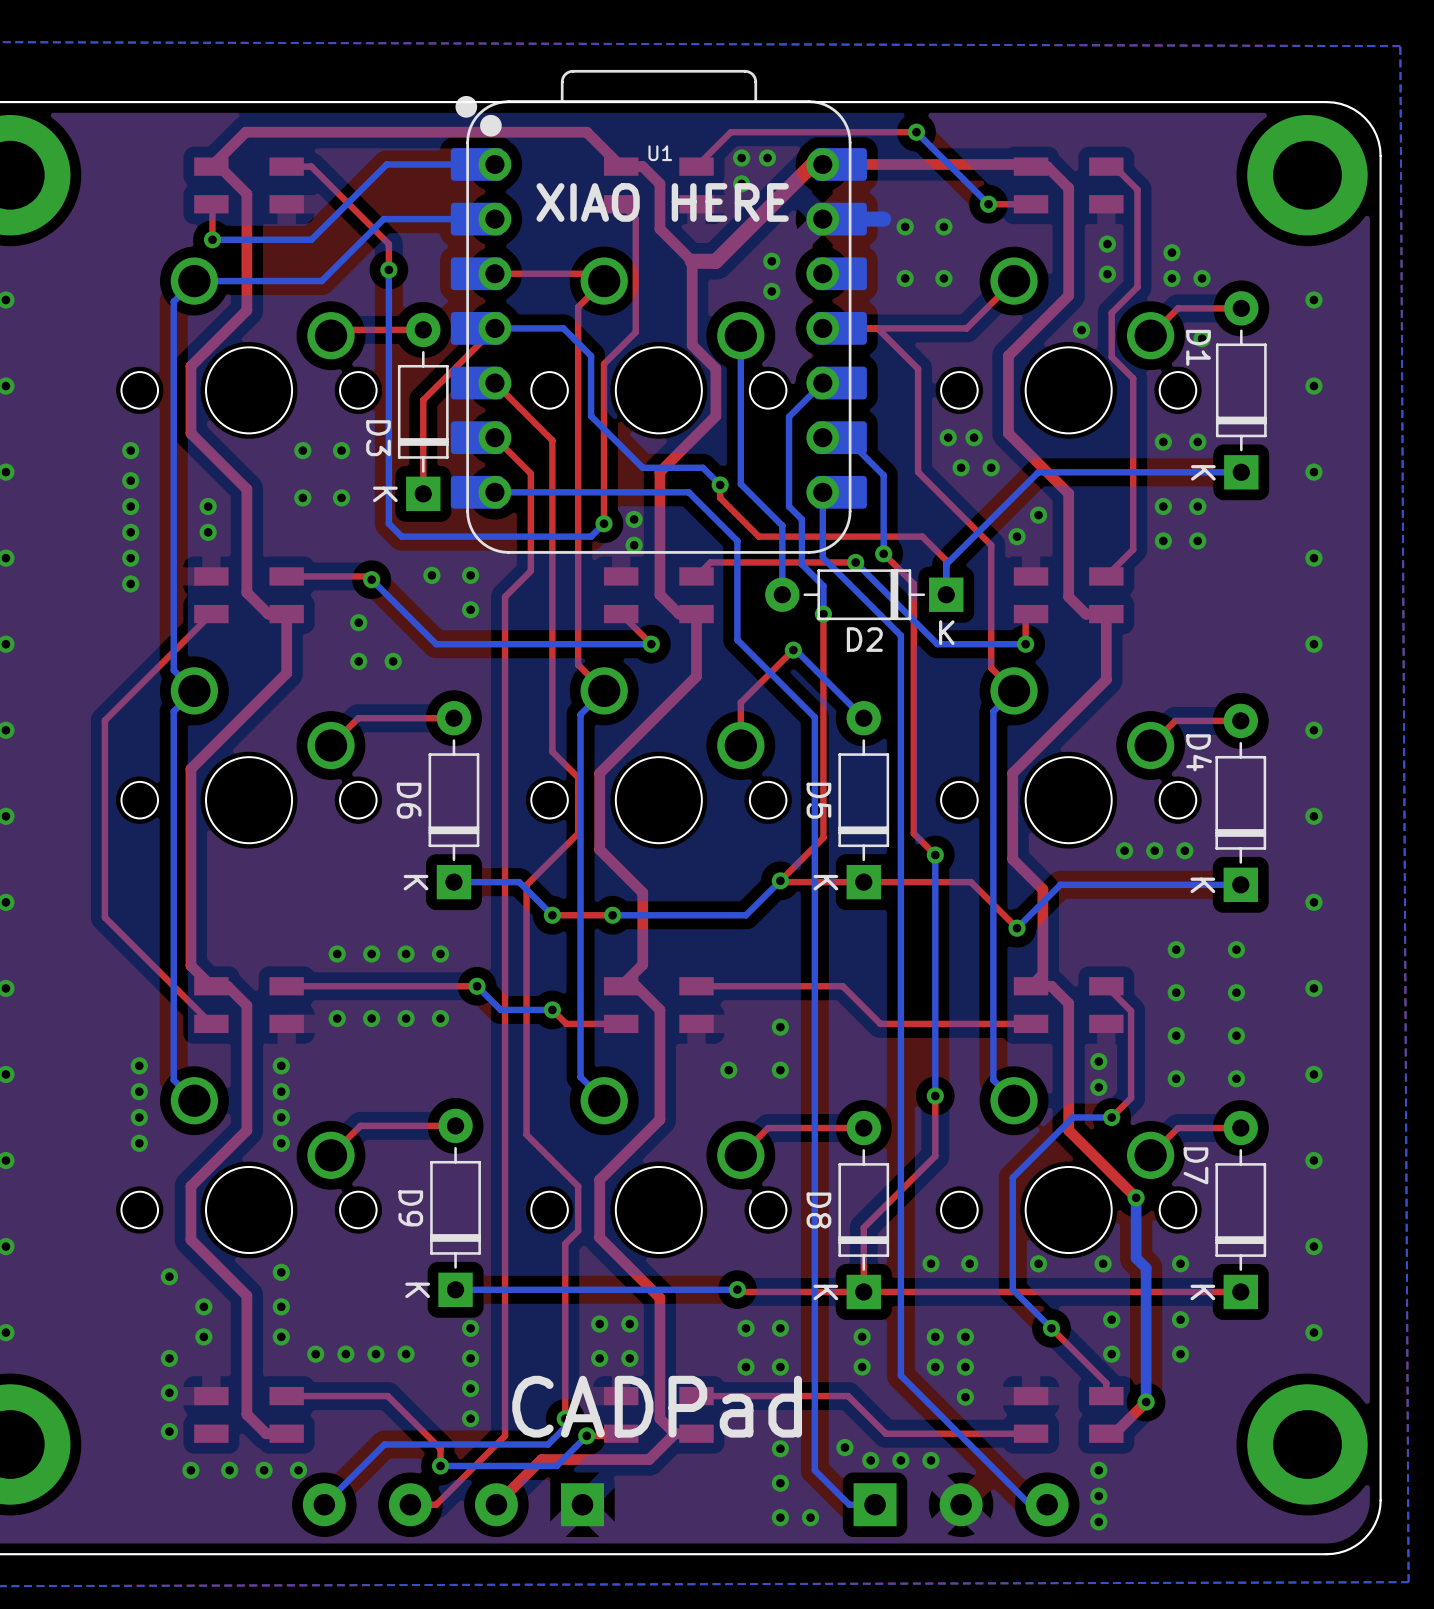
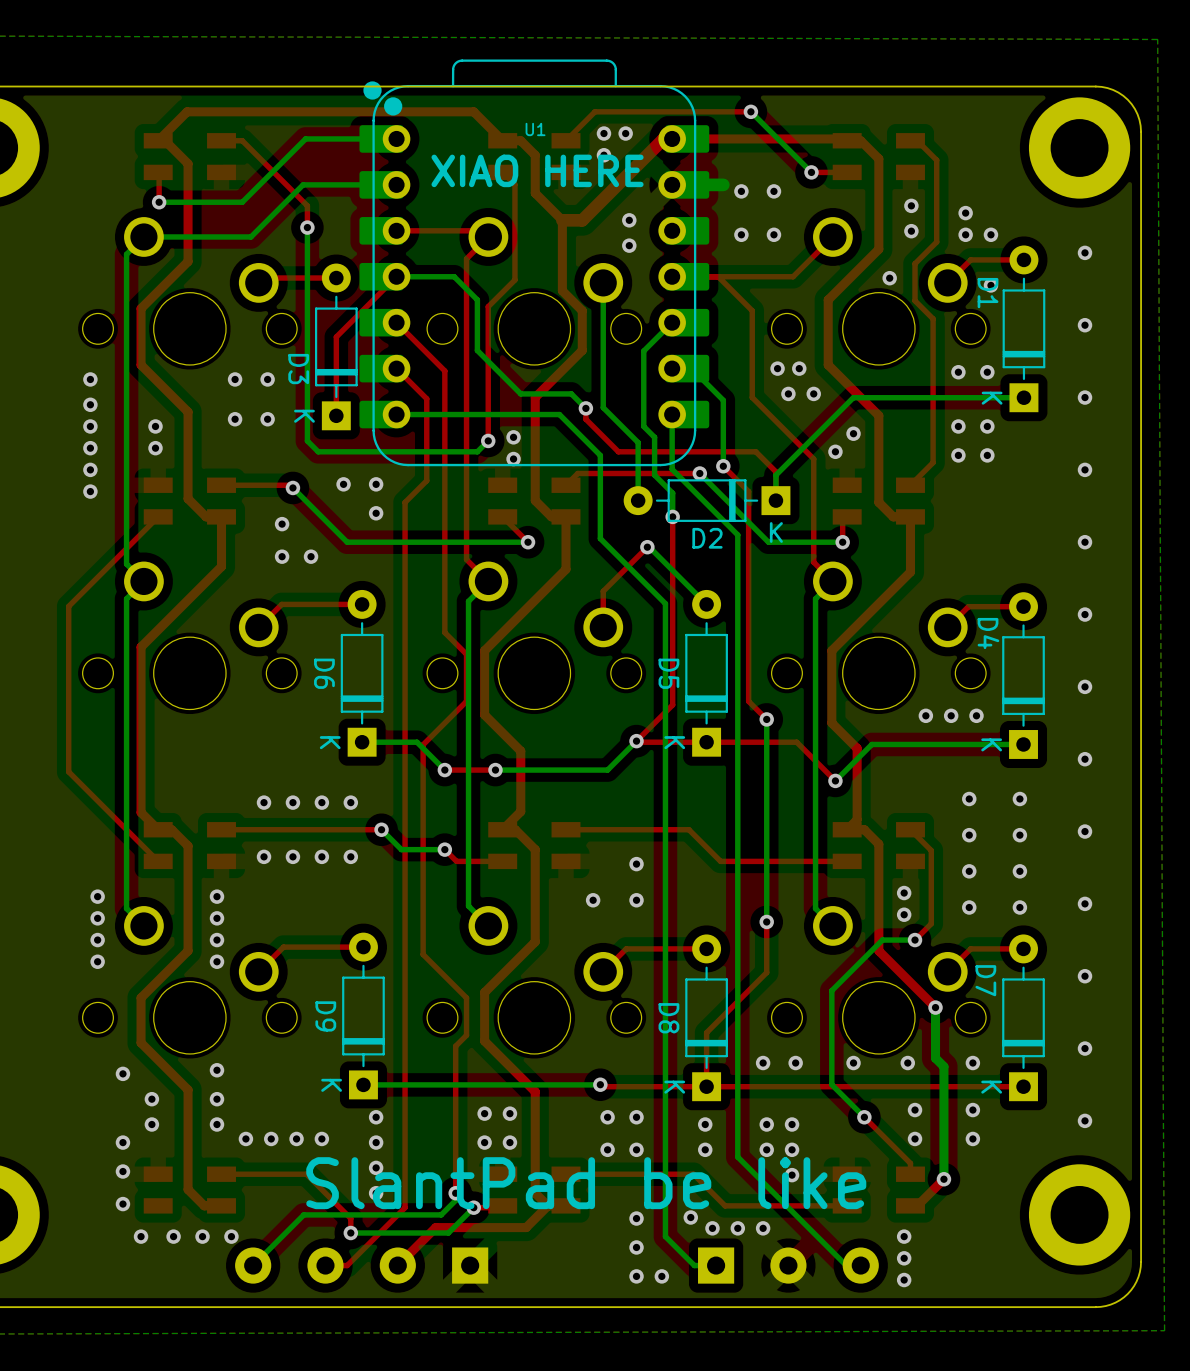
text: CADPad (657, 1406) -> none
text: none -> SlantPad be like (586, 1183)

